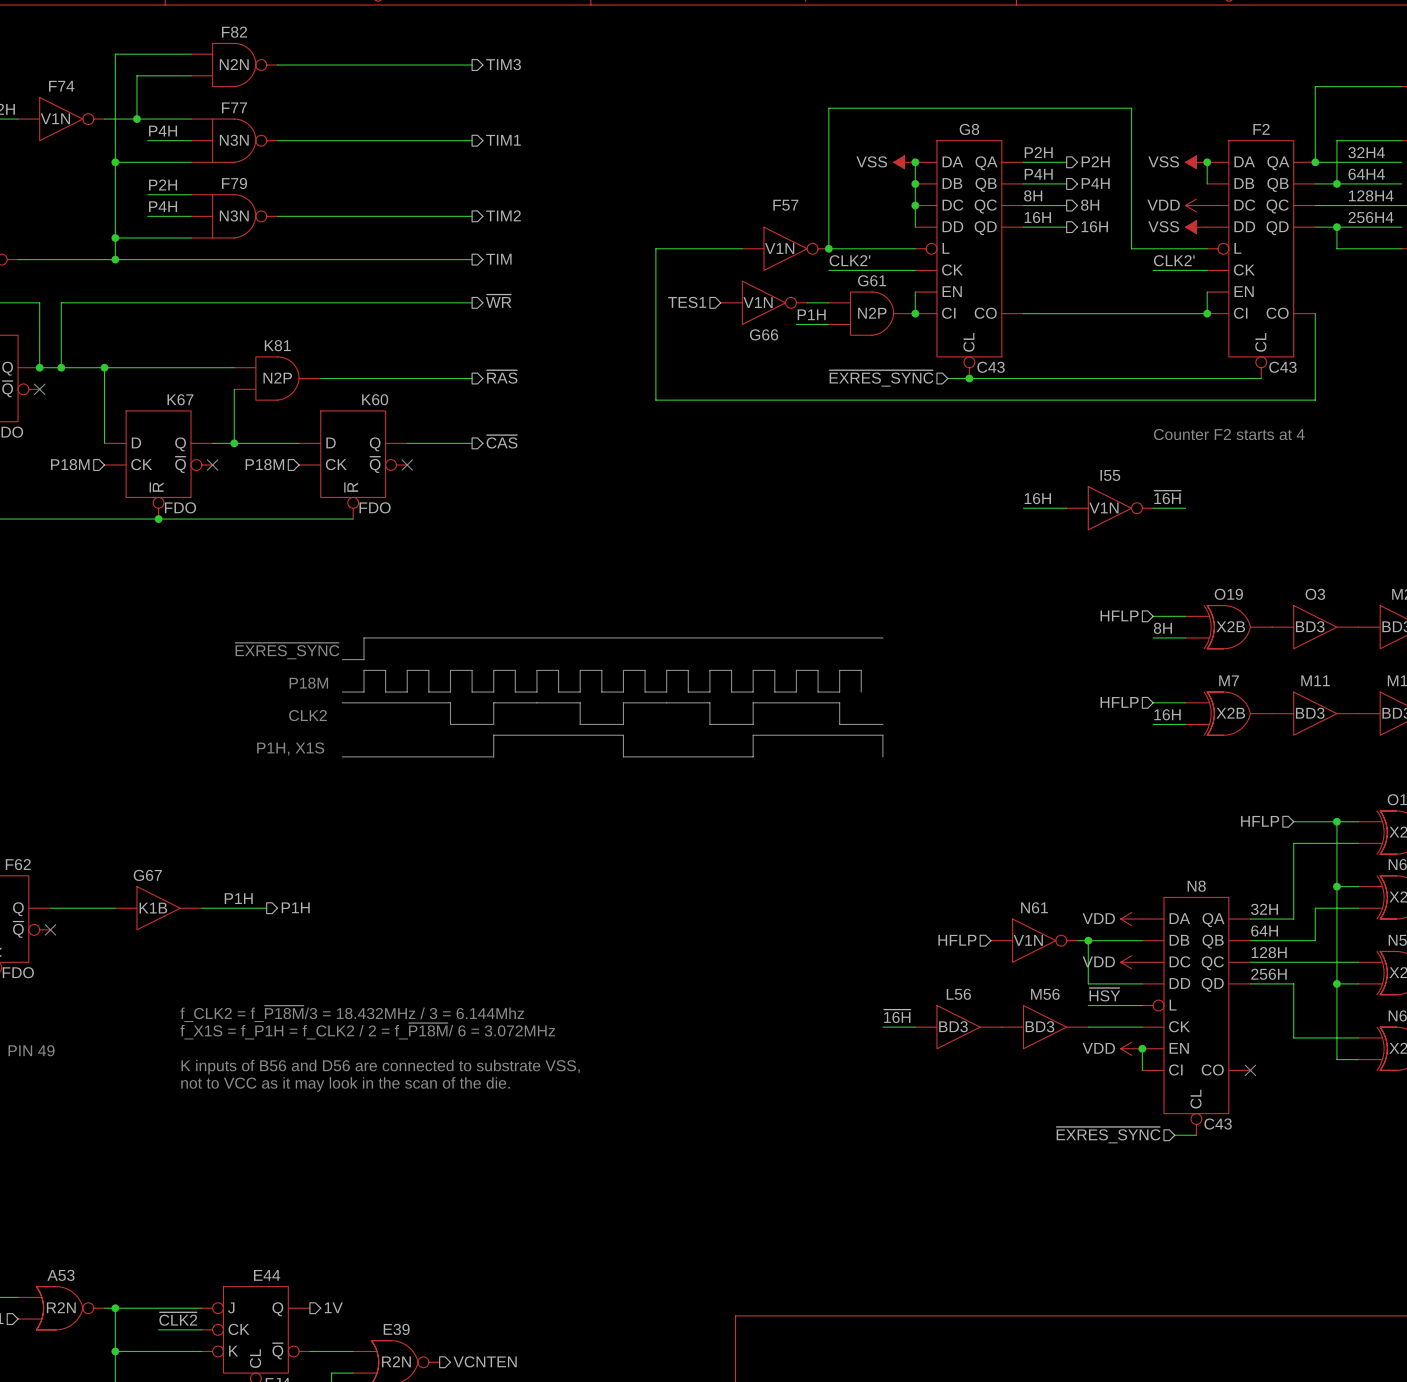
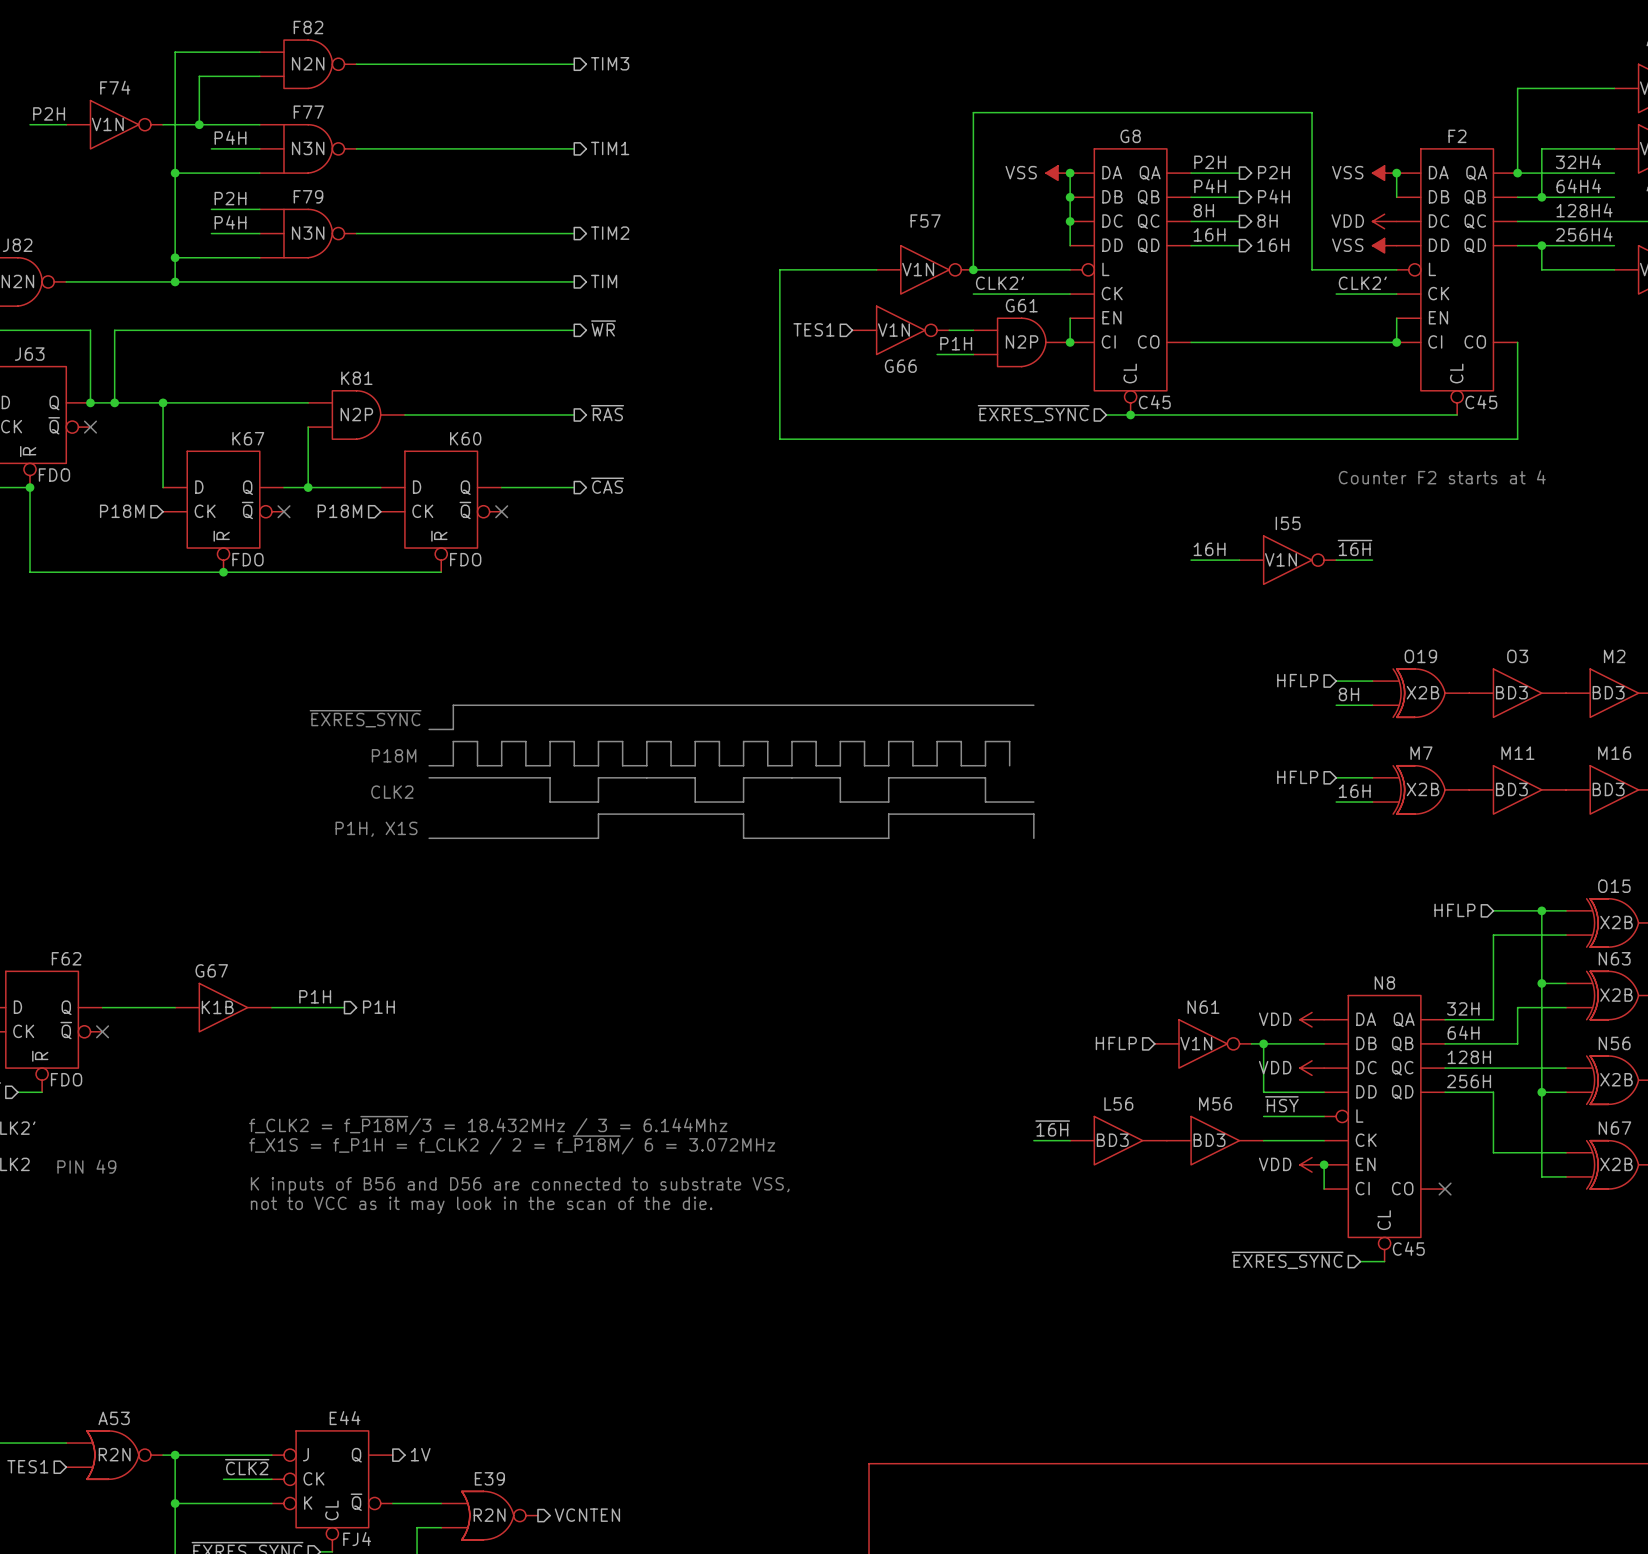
G8 value: C43 (991, 367) -> C45 (1154, 402)
F2 value: C43 (1282, 367) -> C45 (1481, 402)
N8 value: C43 (1218, 1124) -> C45 (1408, 1248)

